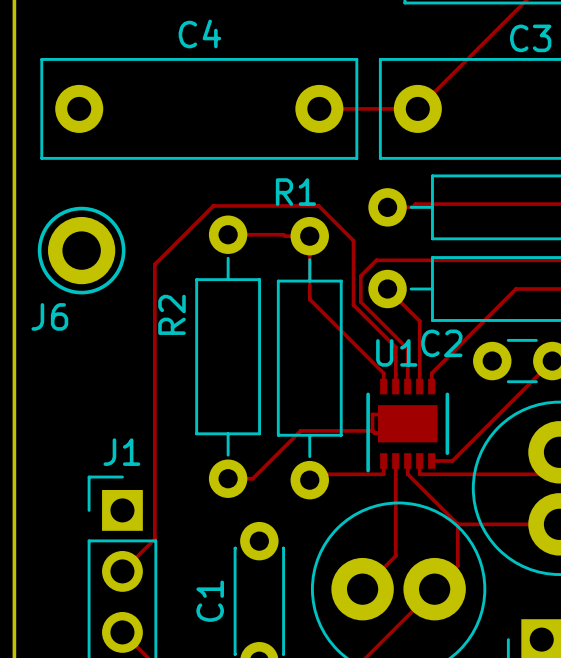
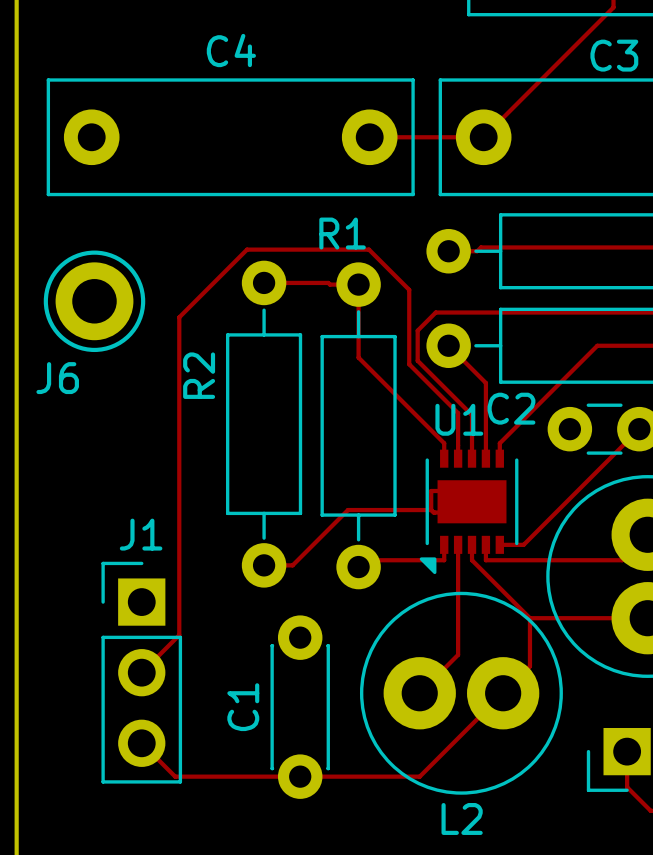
U1 footprint: [366, 378, 450, 473] -> [419, 449, 519, 575]

